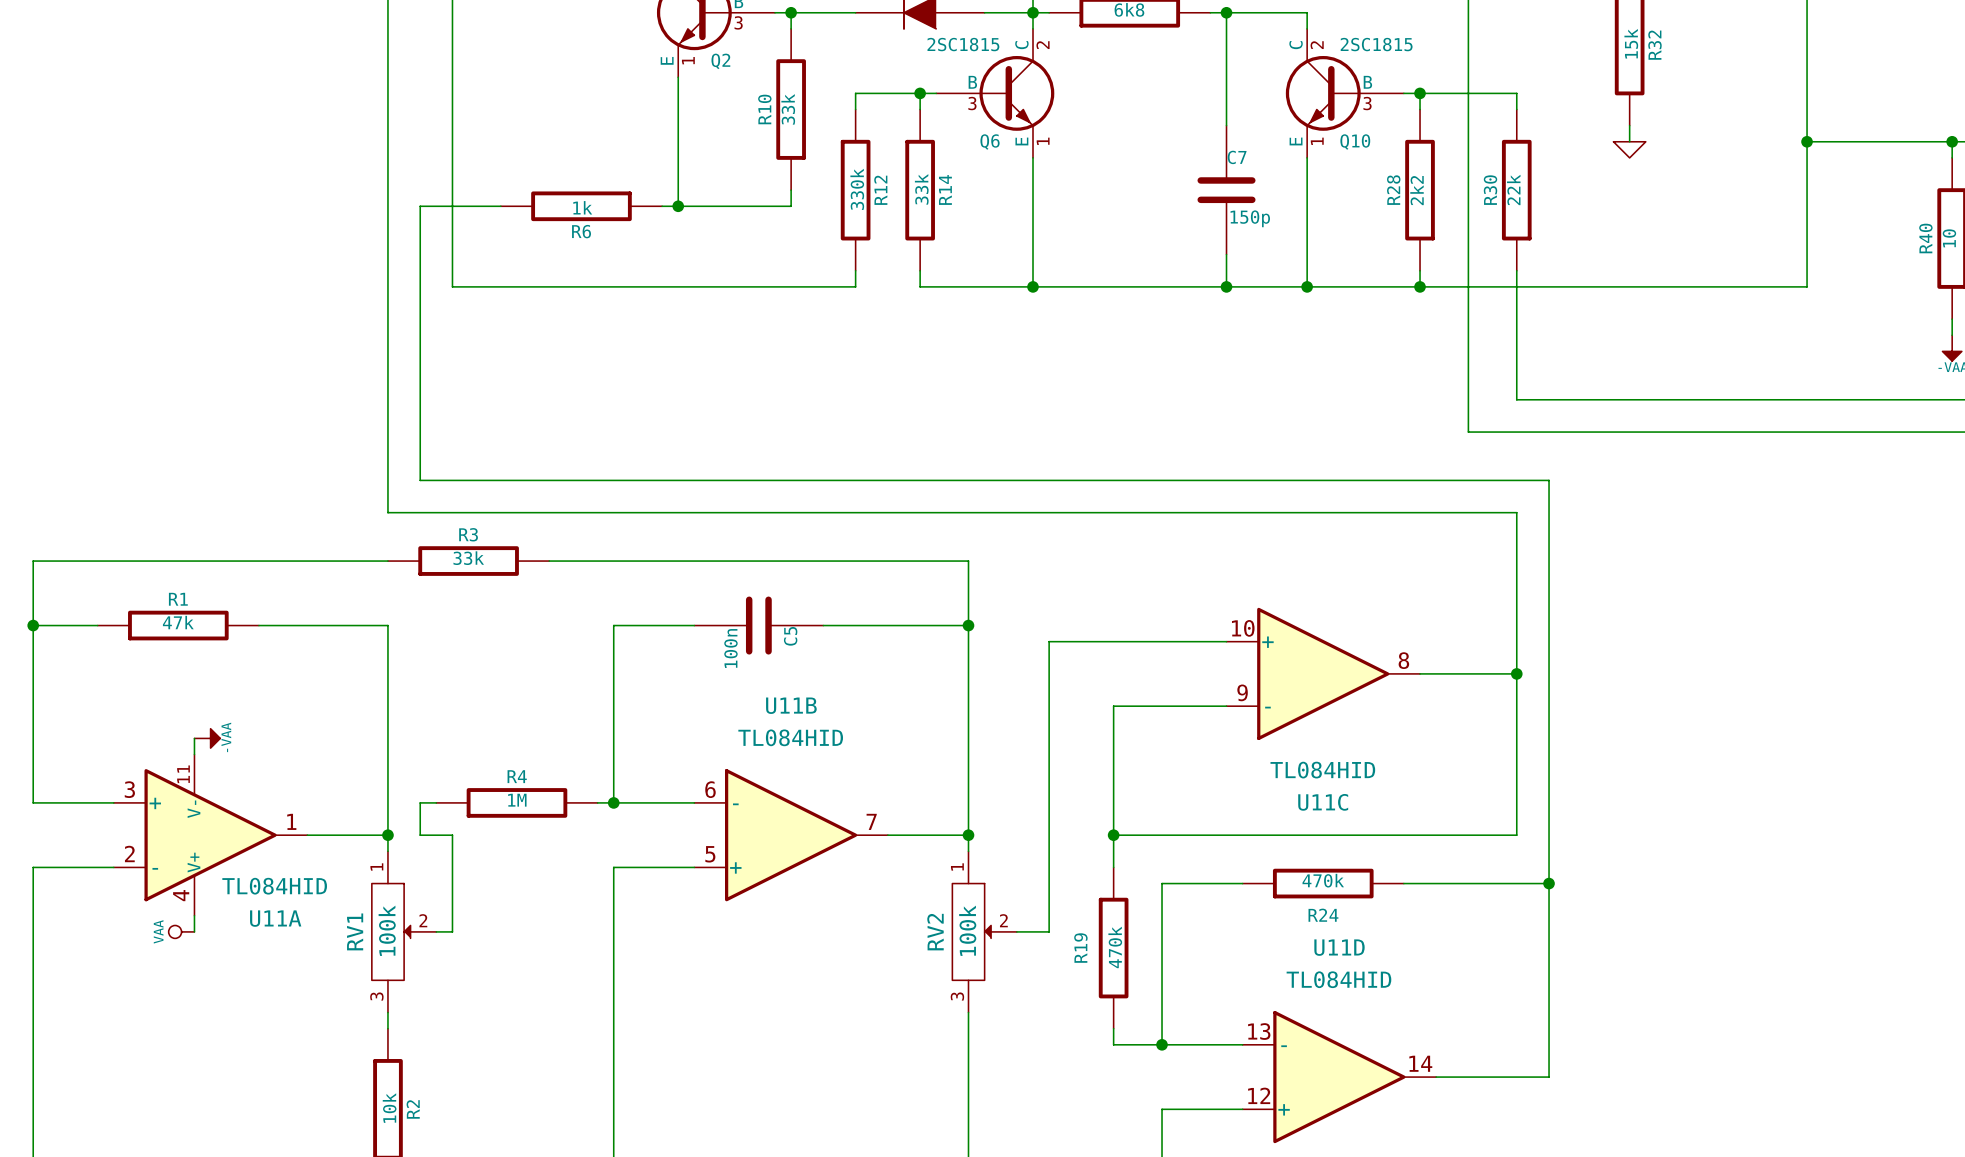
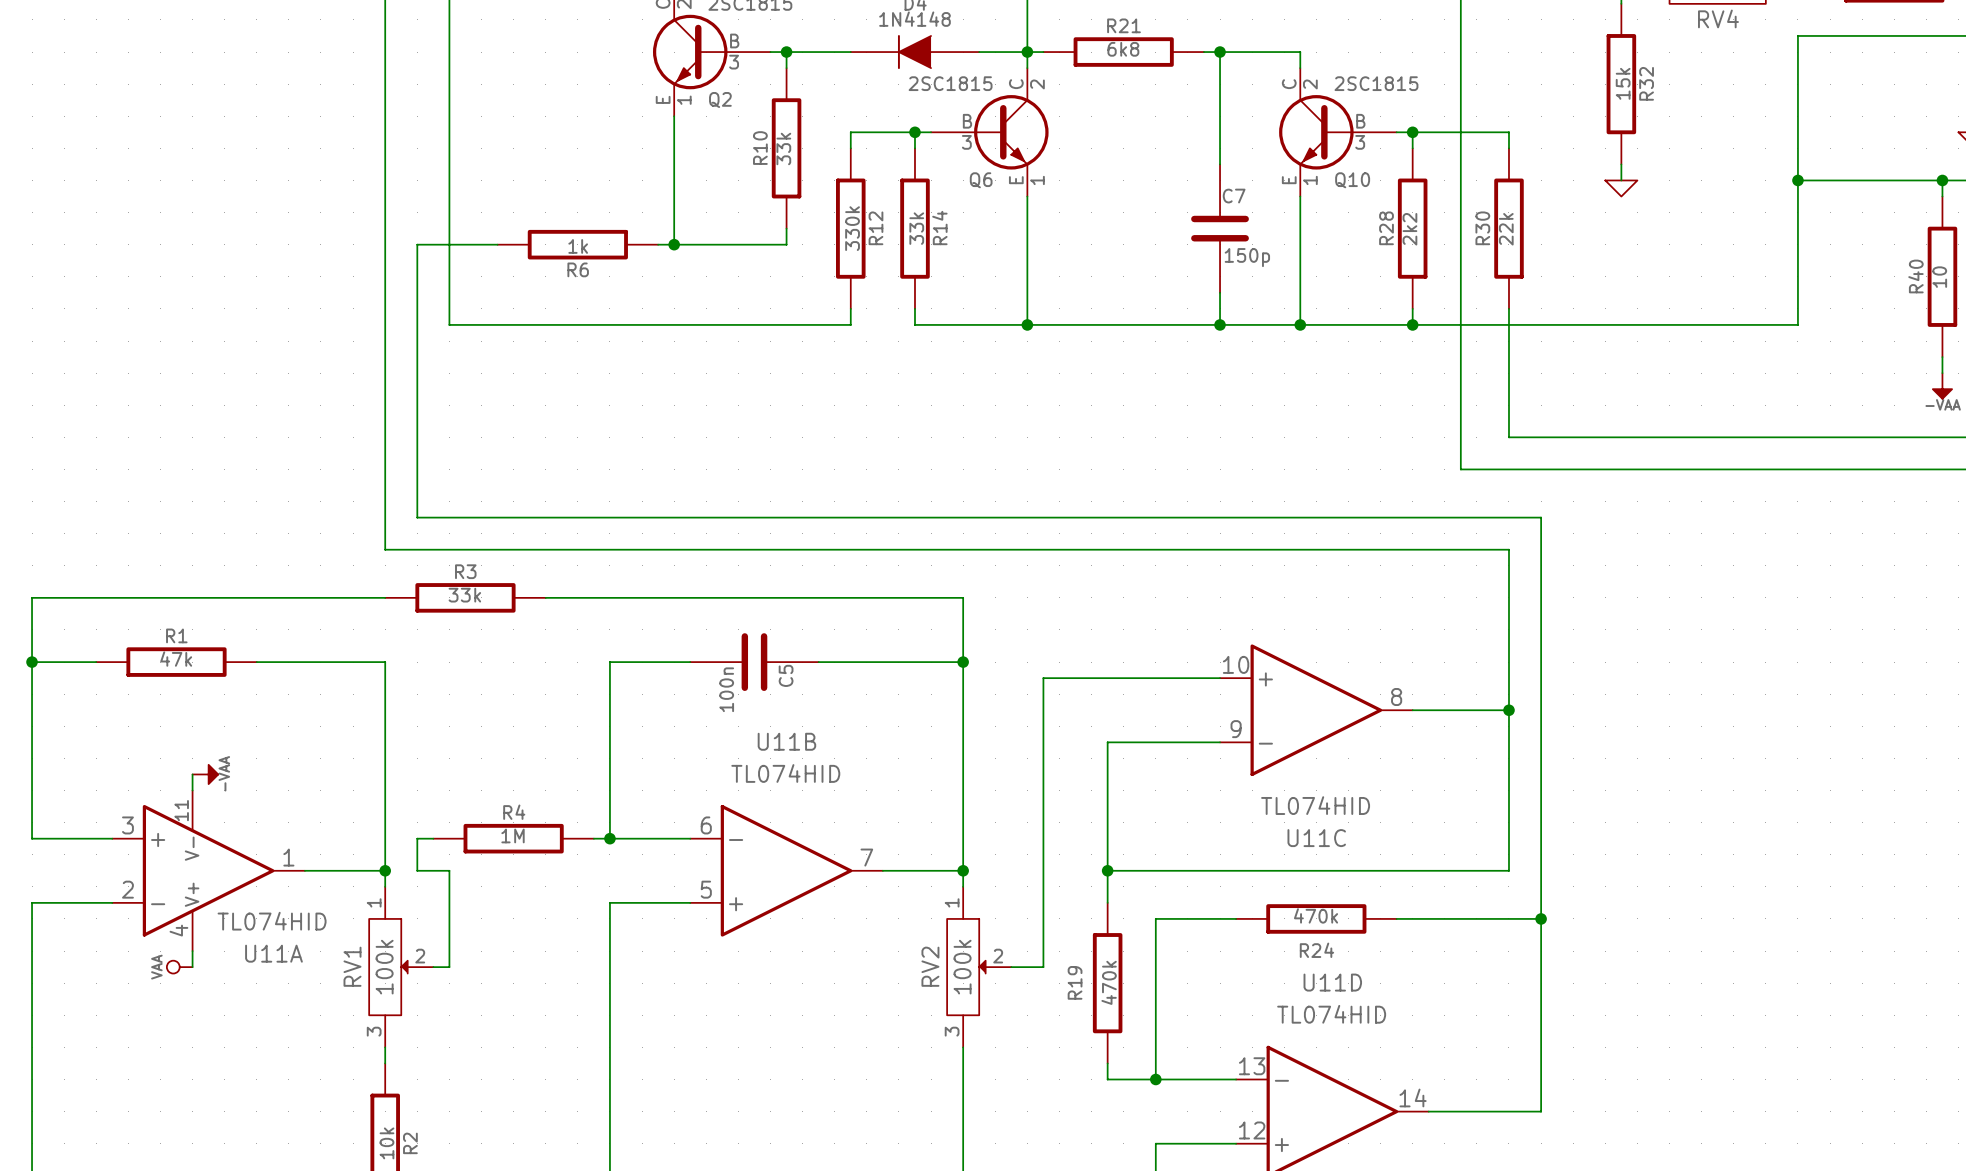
U11B value: TL084HID (790, 737) -> TL074HID (785, 773)
U11C value: TL084HID (1322, 770) -> TL074HID (1315, 805)
U11A value: TL084HID (274, 886) -> TL074HID (272, 921)
U11D value: TL084HID (1338, 979) -> TL074HID (1331, 1014)

